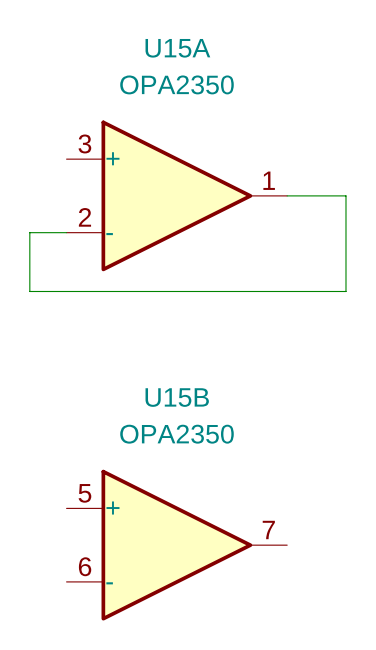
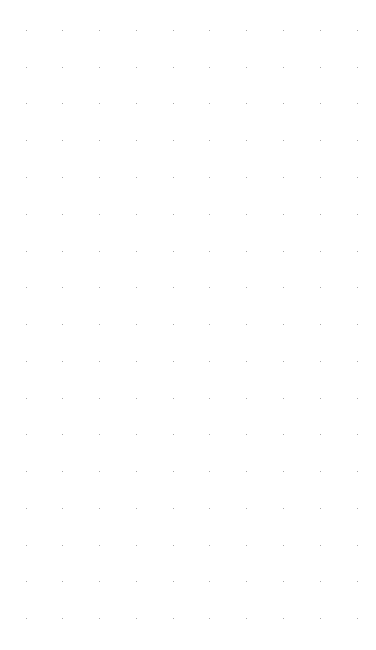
U15A: OPA2350 (176, 195) -> none
wire: (287, 195) (345, 195) (345, 291) (29, 291) (29, 232) (66, 232) -> none
U15B: OPA2350 (176, 545) -> none

